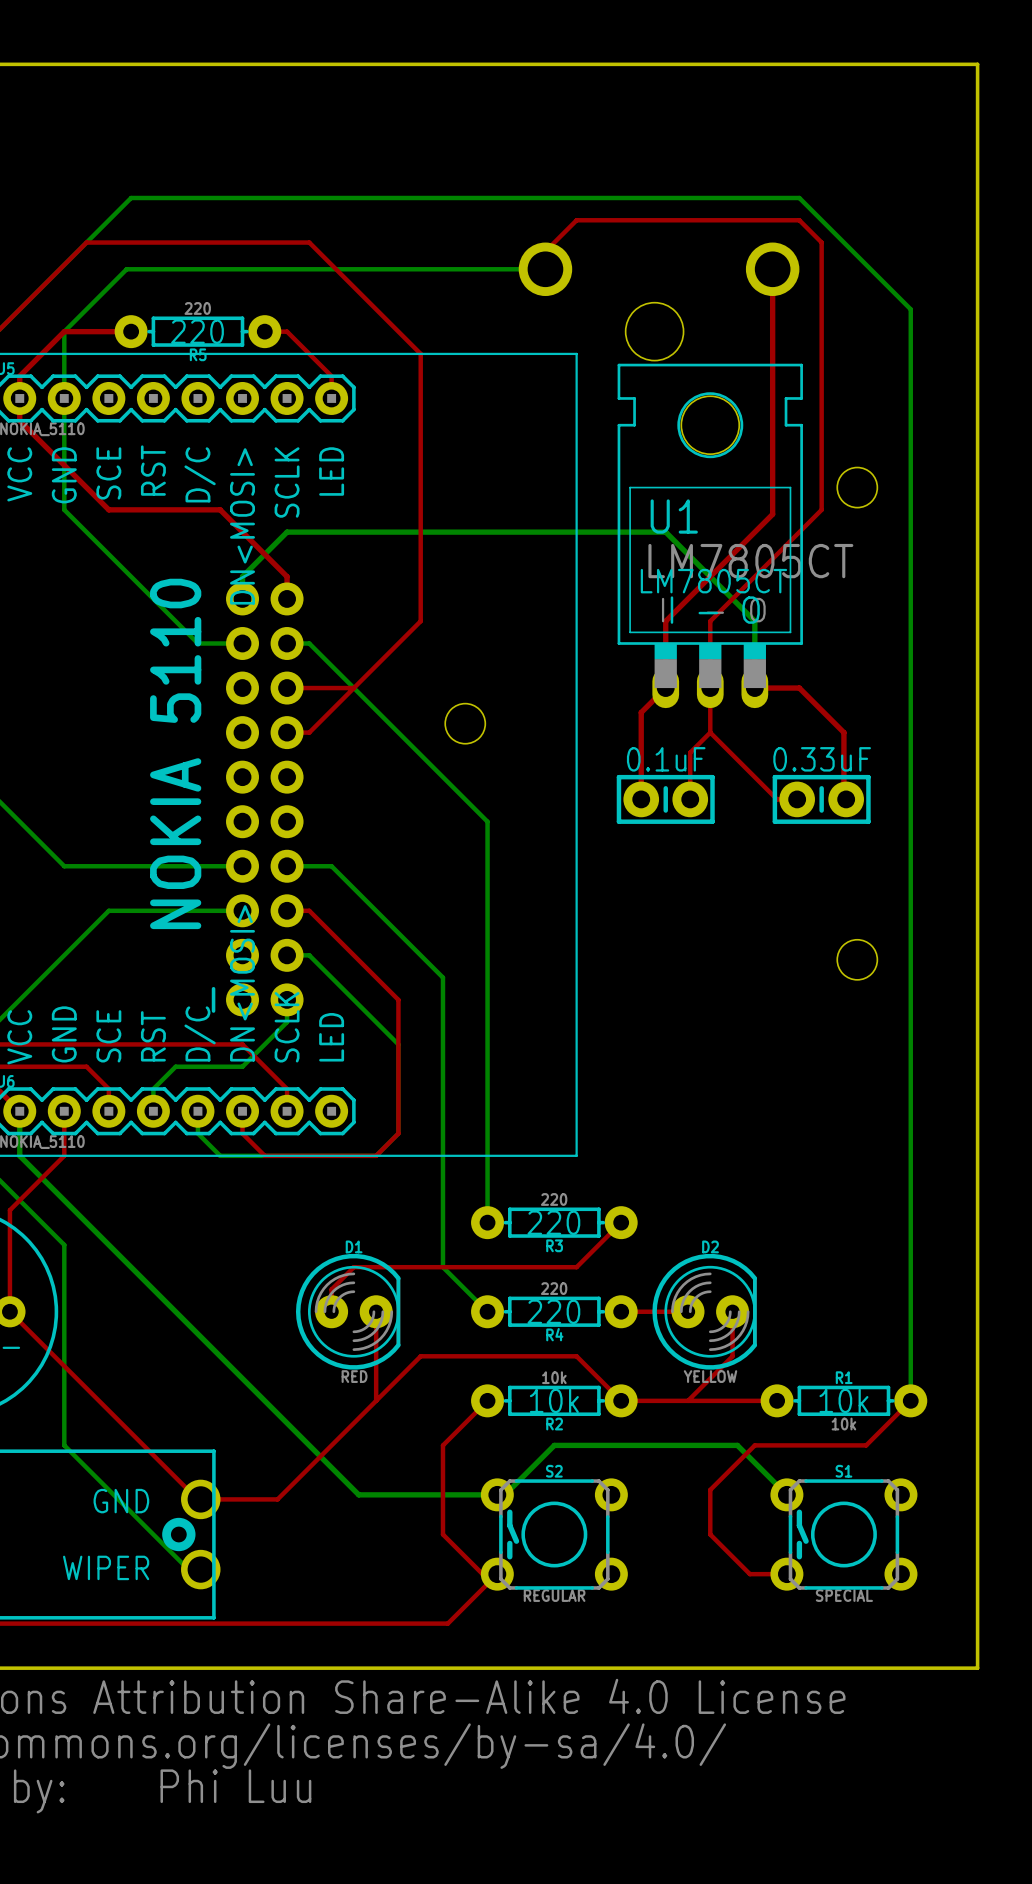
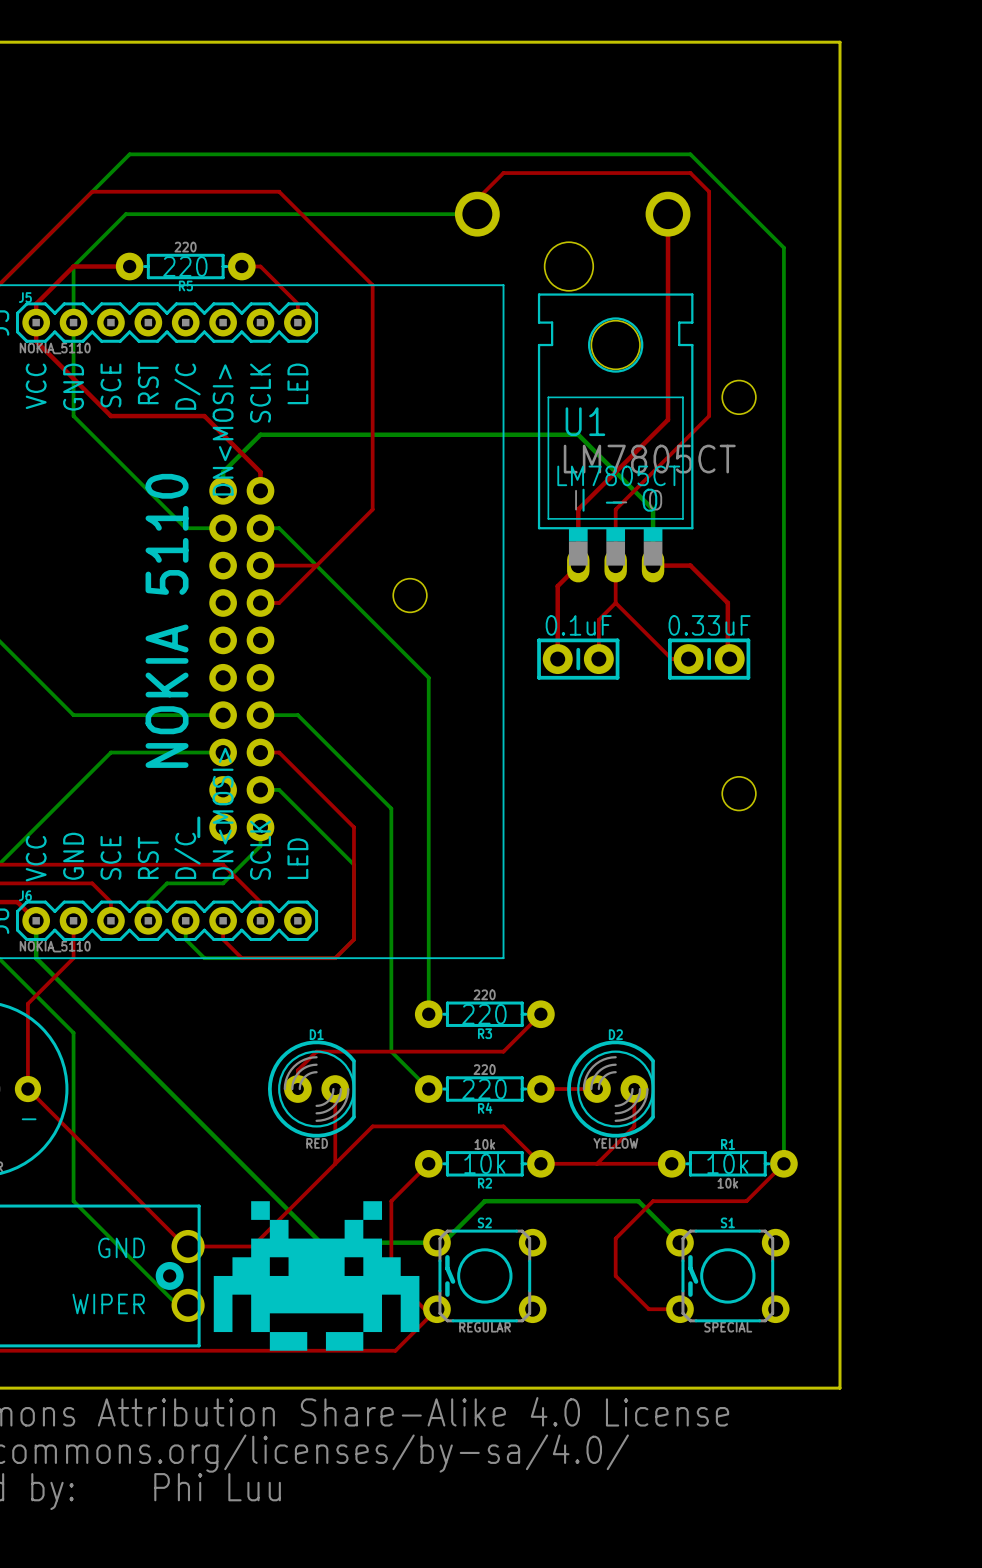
drawing: none -> [213, 1201, 420, 1351]

